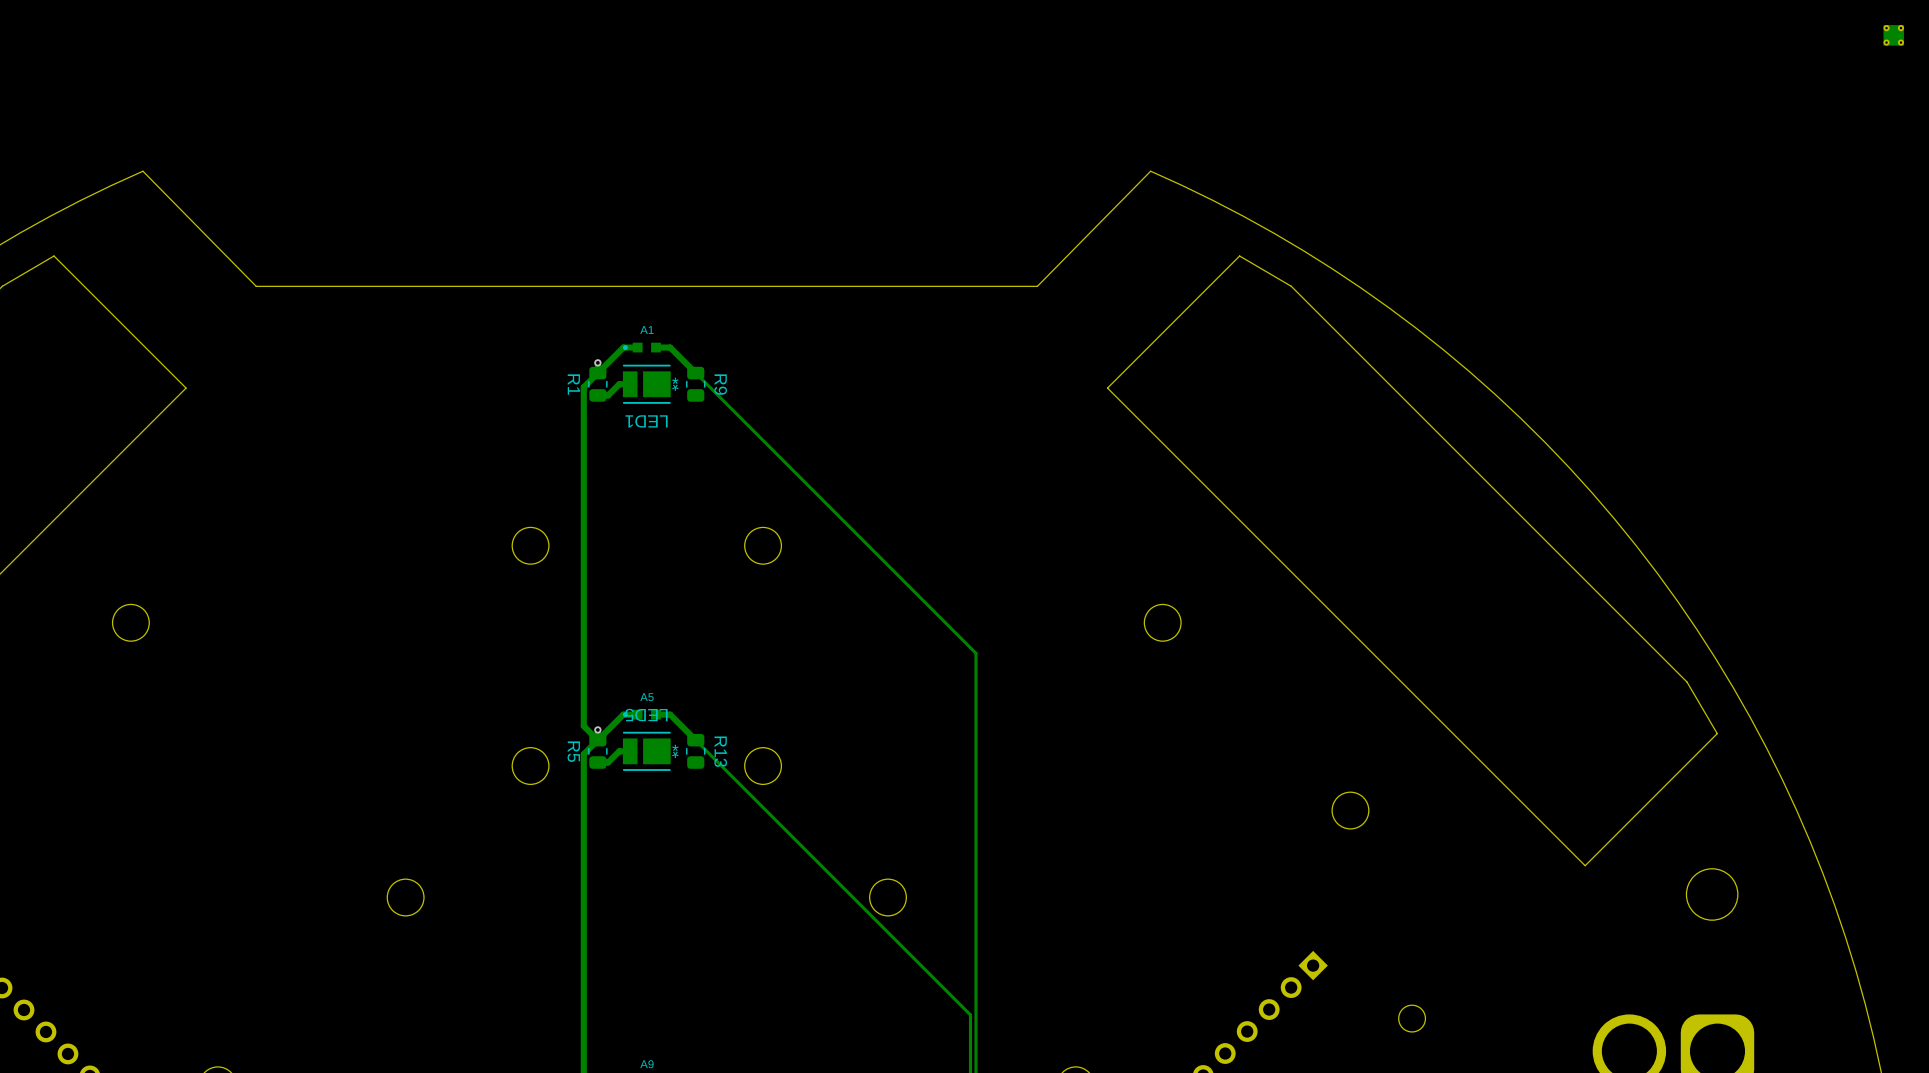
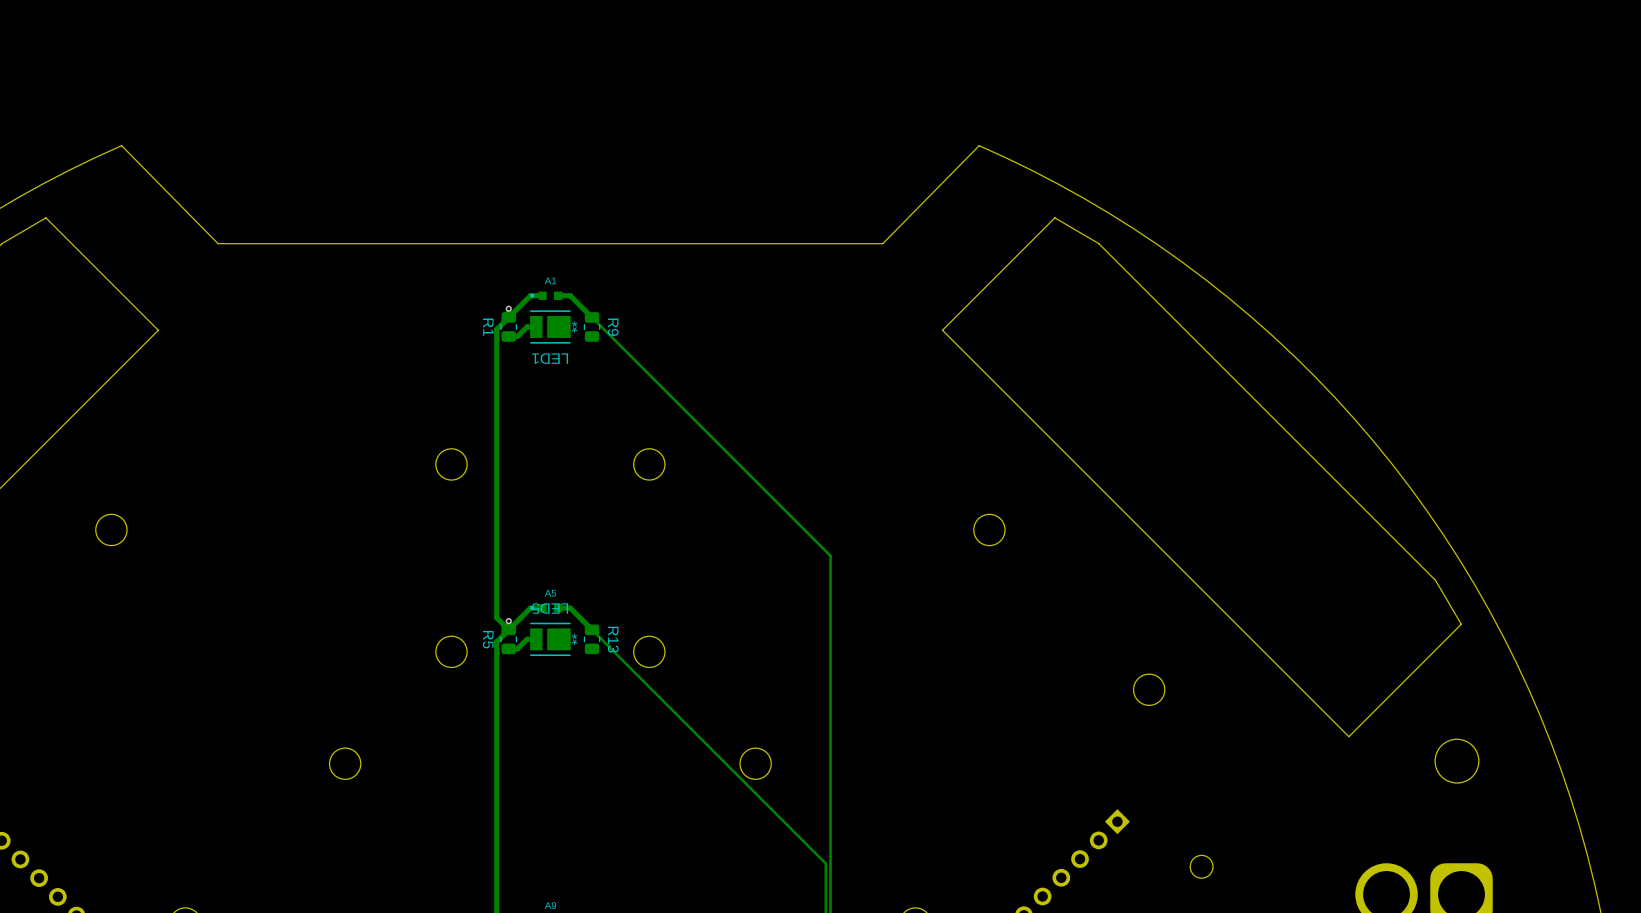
part: (1893, 35) -> none

